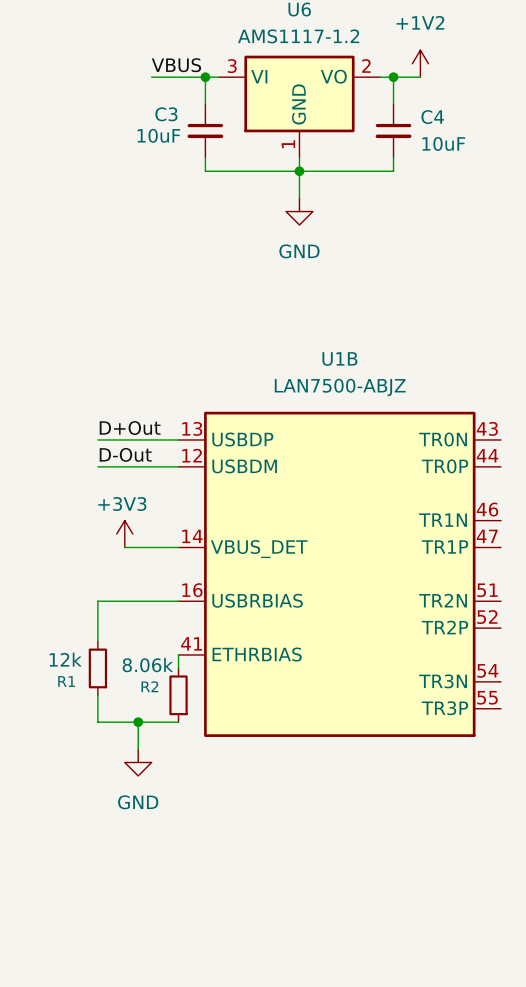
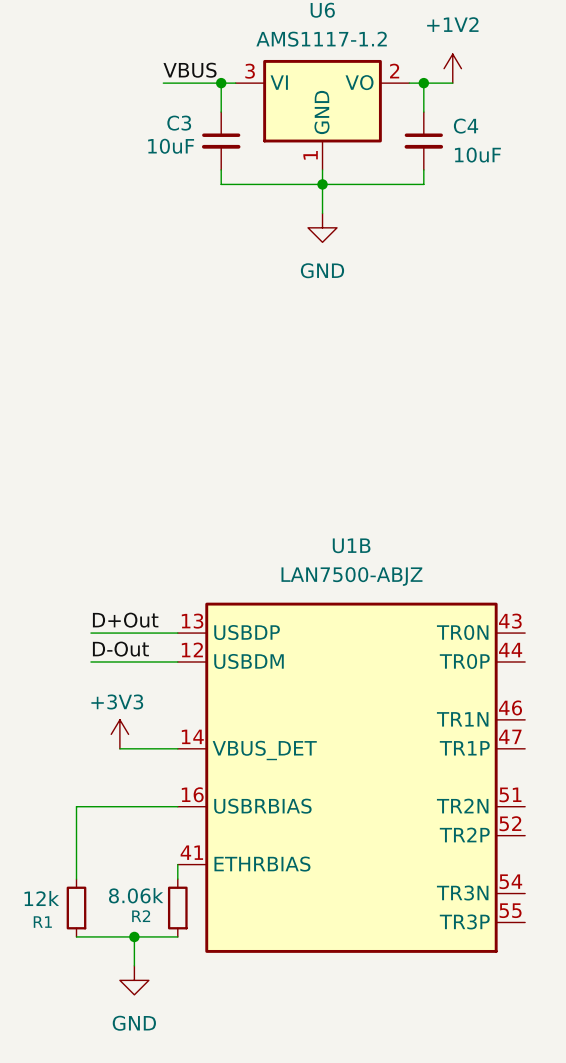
label position: D+Out (130, 428) -> D+Out (125, 620)
wire: (97, 439) (178, 439) -> (90, 633) (177, 633)
label position: D-Out (125, 454) -> D-Out (120, 649)
wire: (97, 466) (178, 466) -> (90, 661) (177, 661)
power symbol position: +3V3 (124, 534) -> +3V3 (119, 734)
wire: (124, 547) (178, 547) -> (119, 748) (177, 748)
U1B position: (339, 574) -> (351, 777)
wire: (178, 601) (97, 601) (97, 641) -> none
wire: (178, 655) (178, 668) -> (177, 864) (177, 879)
R2 value position: 8.06k (147, 665) -> 8.06k (136, 895)
R1 position: (97, 668) -> (76, 908)
R2 name position: R2 (149, 686) -> R2 (141, 916)
wire: (97, 695) (97, 722) (178, 722) -> none
R2 position: (178, 695) -> (177, 908)
wire: (138, 722) (138, 749) -> (134, 936) (134, 965)
junction: (138, 722) -> none
wire: none -> (177, 806) (76, 806) (76, 879)
power symbol position: GND (138, 762) -> GND (134, 980)
wire: none -> (76, 936) (177, 936)
junction: none -> (134, 936)

